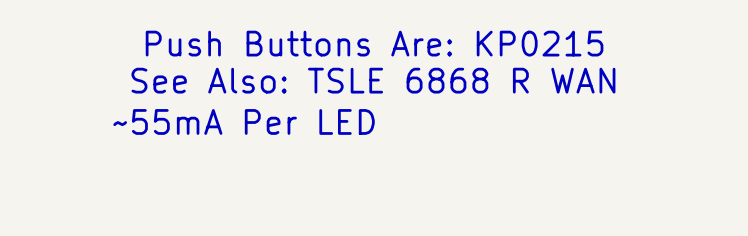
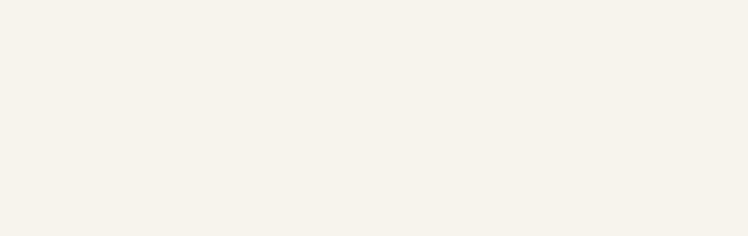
text: Push Buttons Are: KP0215 (374, 43) -> none
text: See Also: TSLE 6868 R WAN (373, 80) -> none
text: ~55mA Per LED (244, 121) -> none

